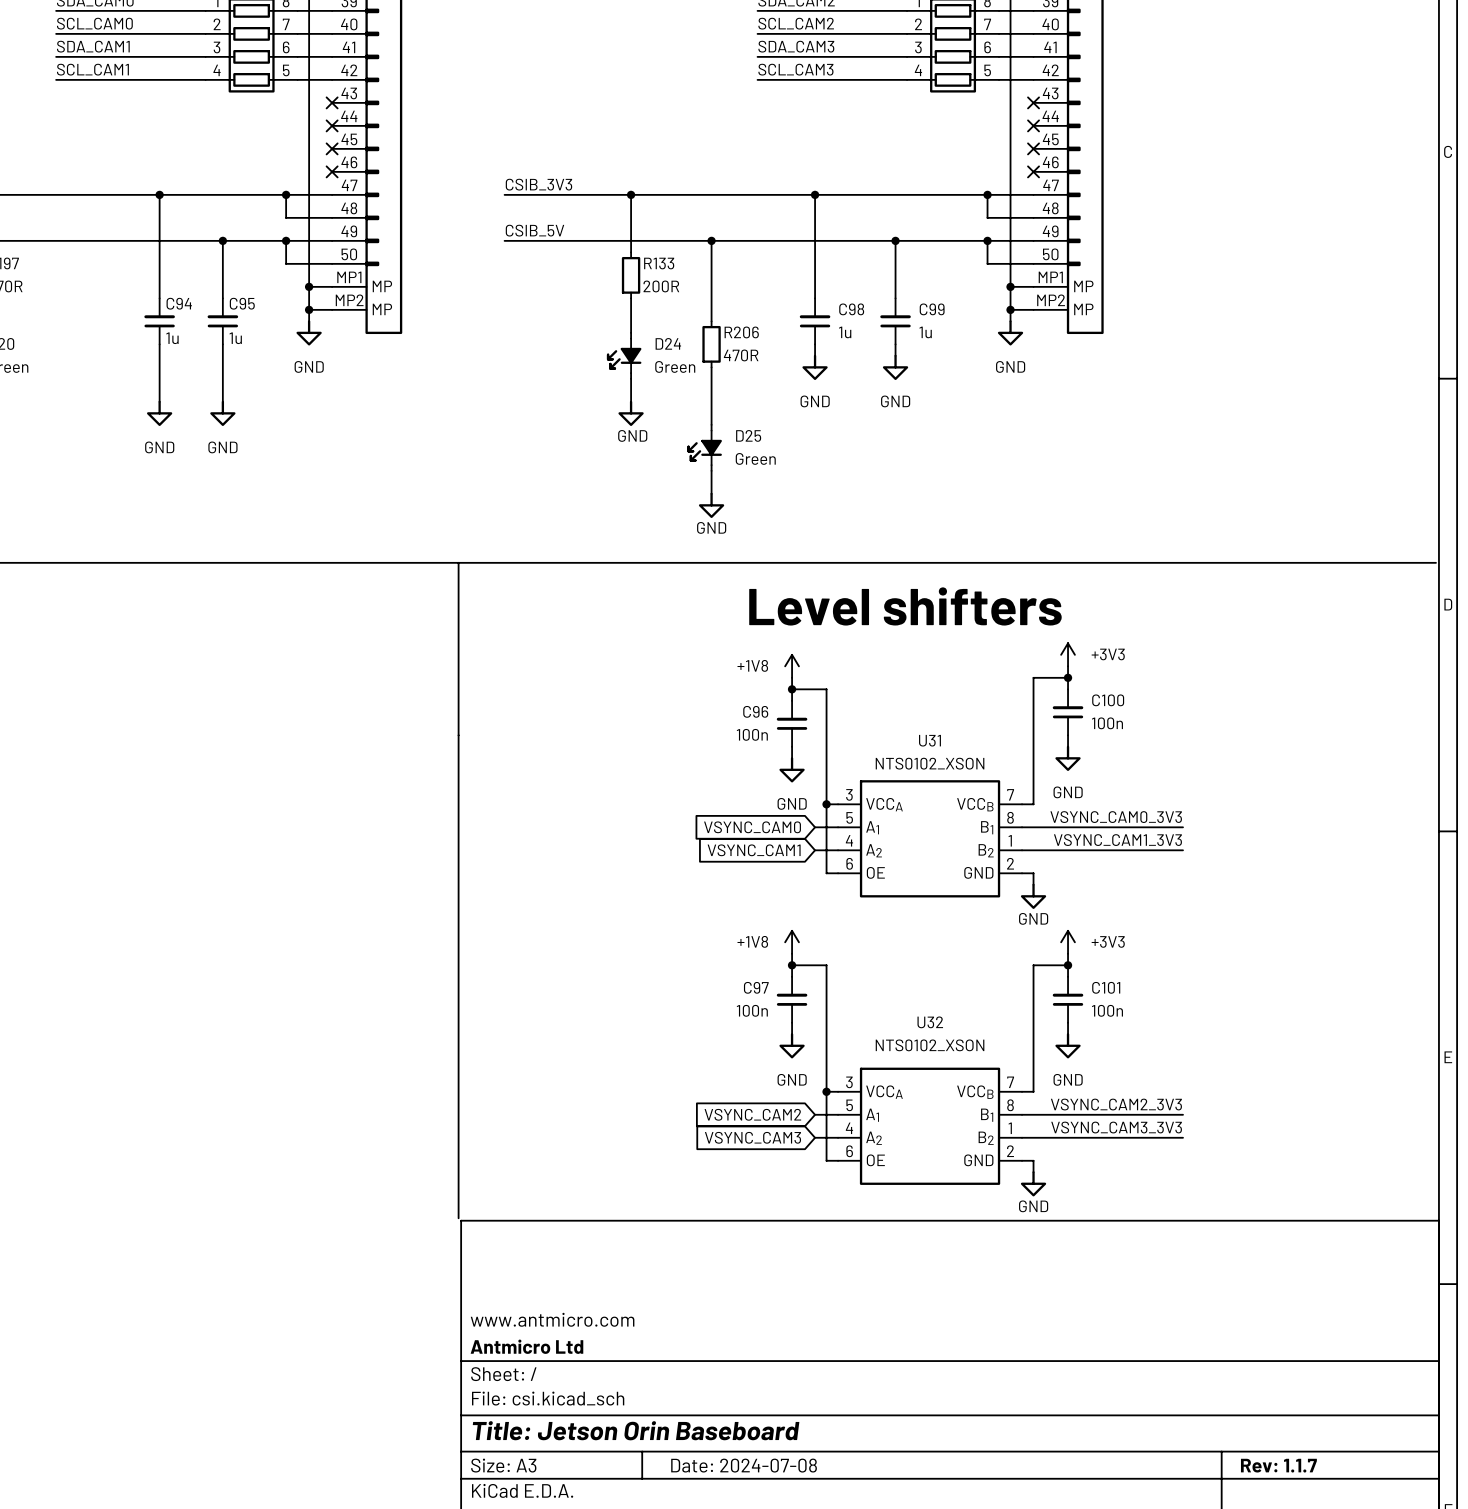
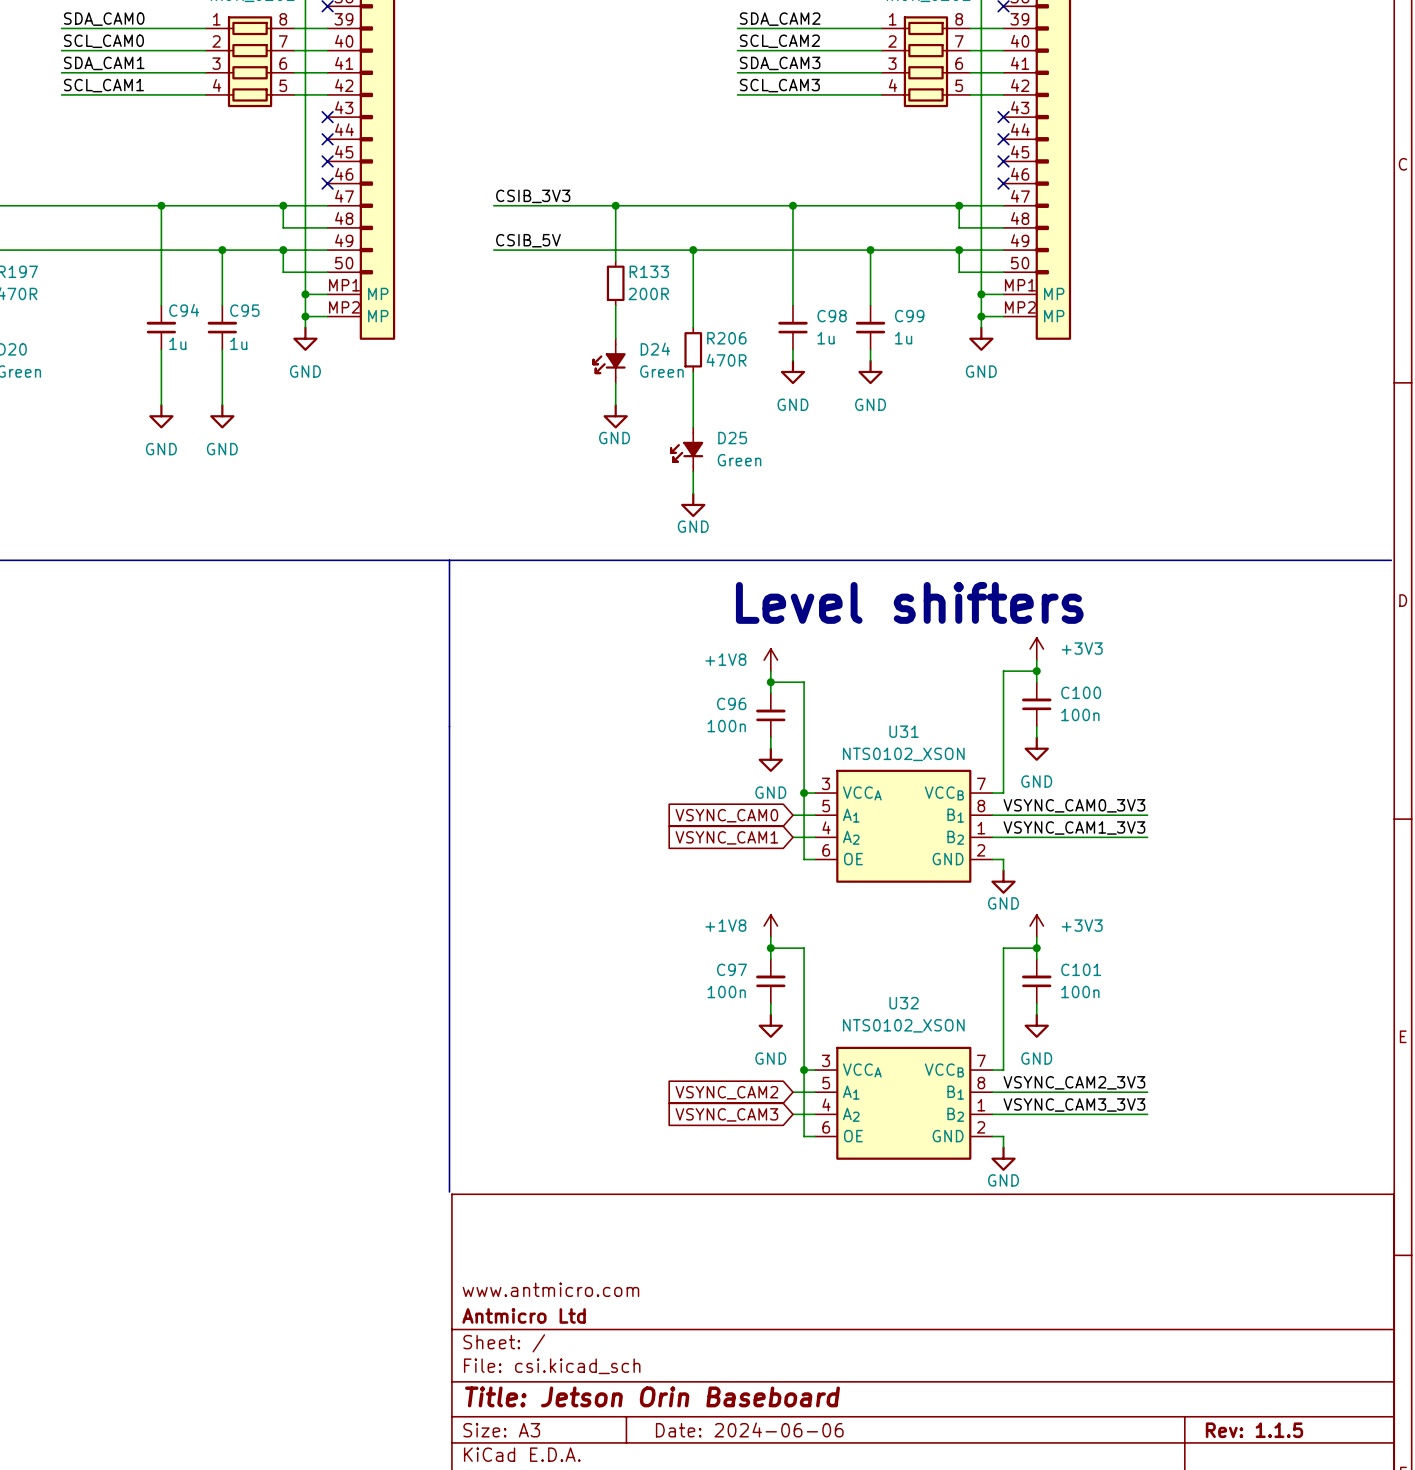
title block: Date: 2024-07-08 (744, 1465) -> Date: 2024-06-06 (749, 1429)
title block: Rev: 1.1.7 (1278, 1465) -> Rev: 1.1.5 (1254, 1430)

